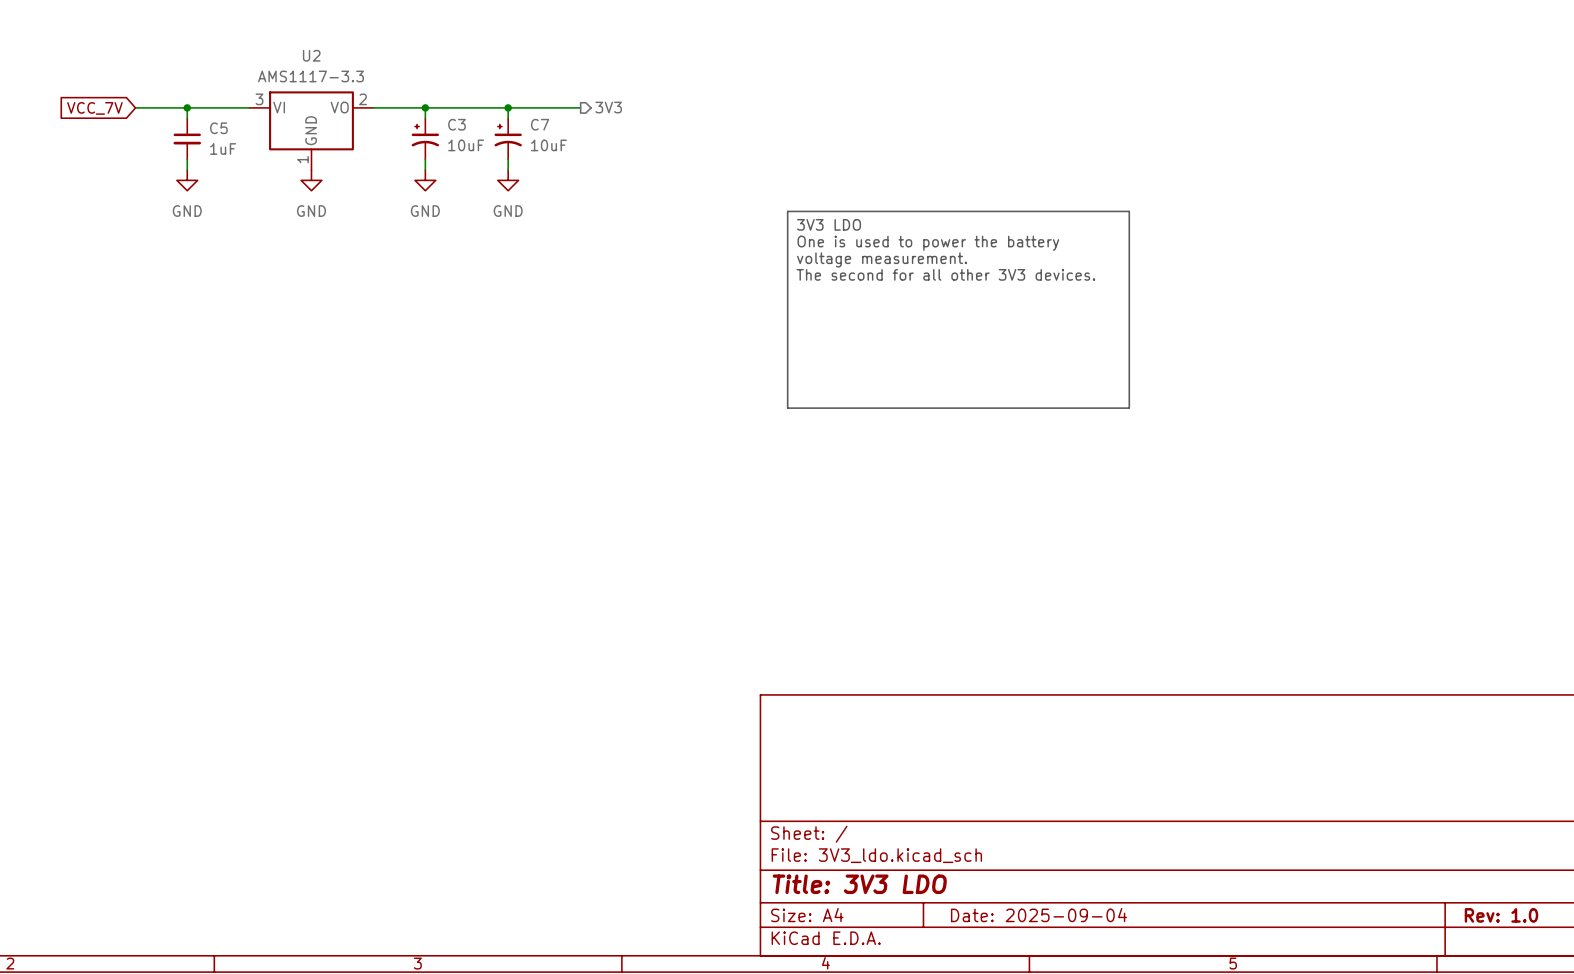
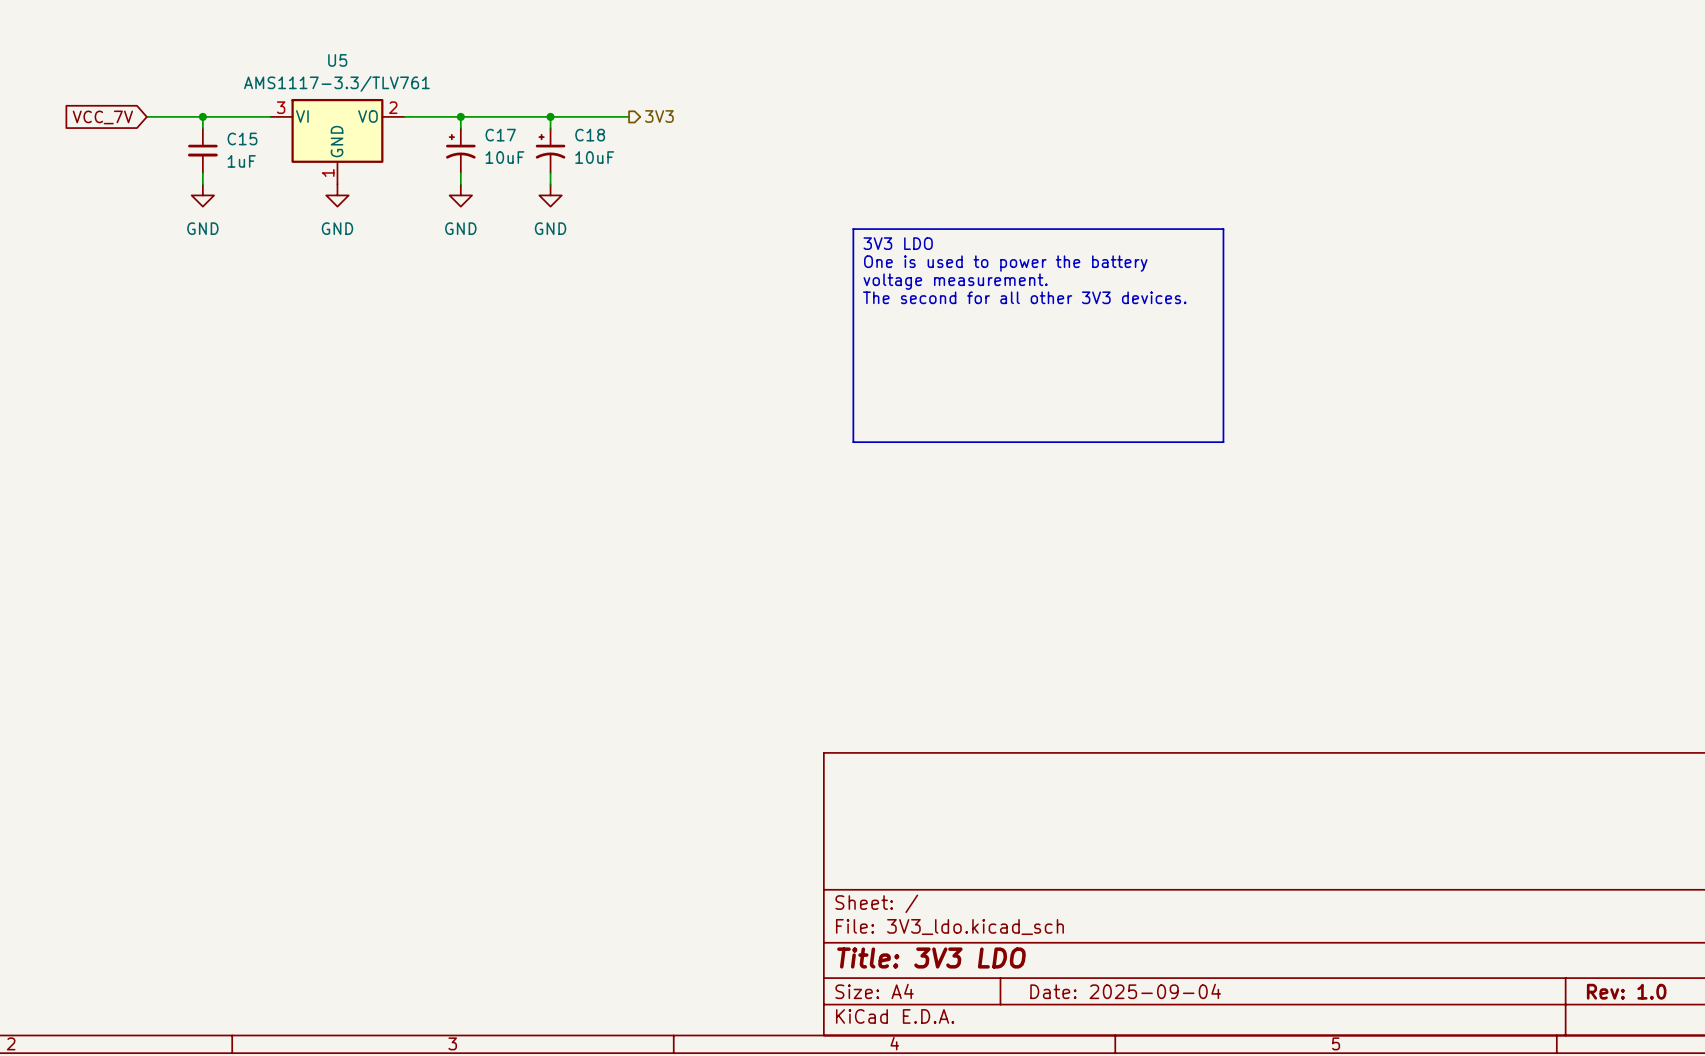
U2 name: U2 (311, 55) -> U5 (337, 60)
U2 value: AMS1117-3.3 (310, 76) -> AMS1117-3.3/TLV761 (336, 83)
C3 name: C3 (456, 124) -> C17 (500, 135)
C7 name: C7 (540, 124) -> C18 (590, 135)
C5 name: C5 (218, 128) -> C15 (242, 138)

